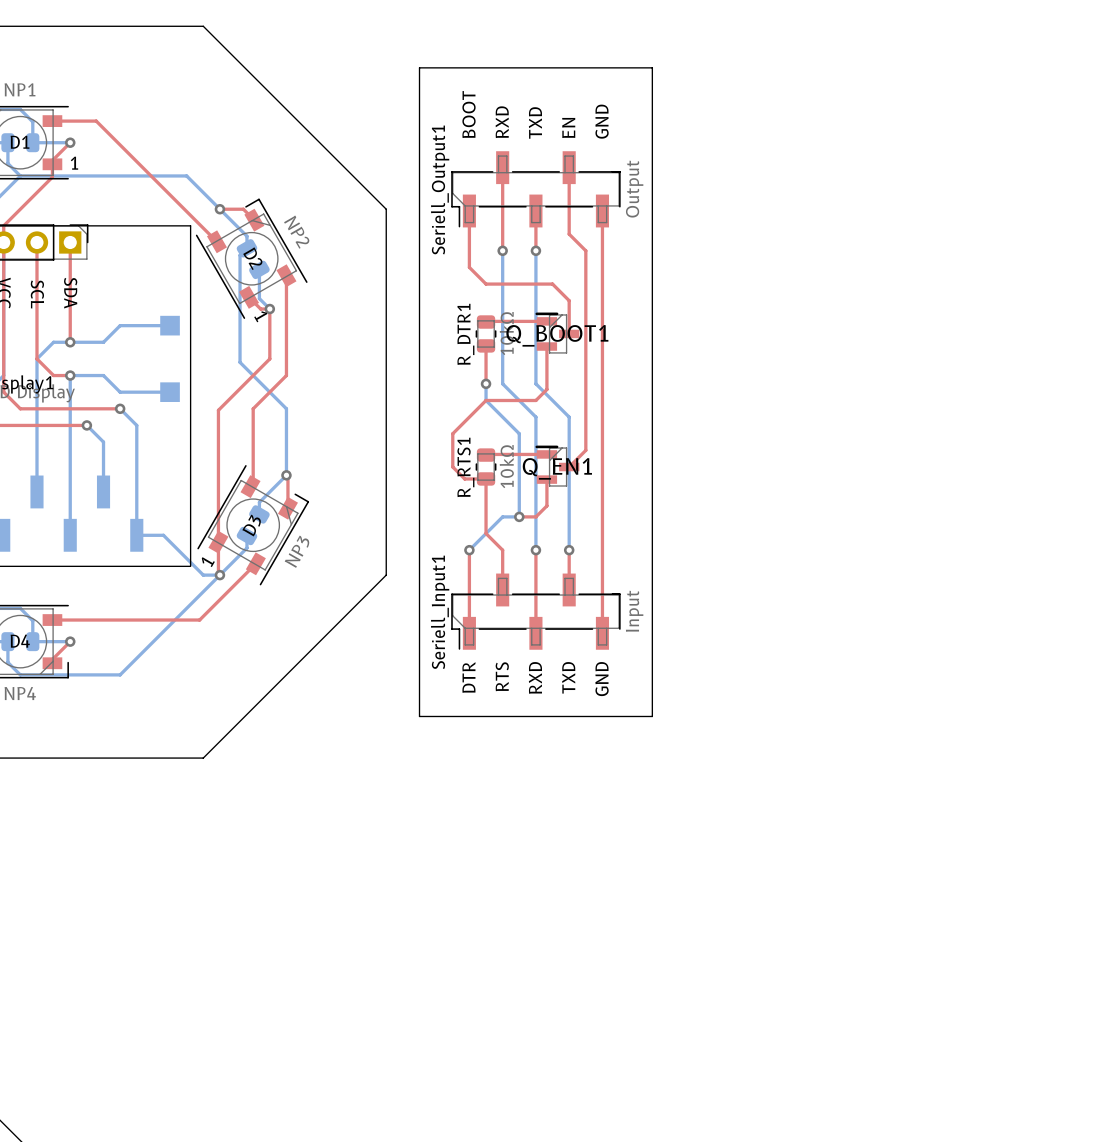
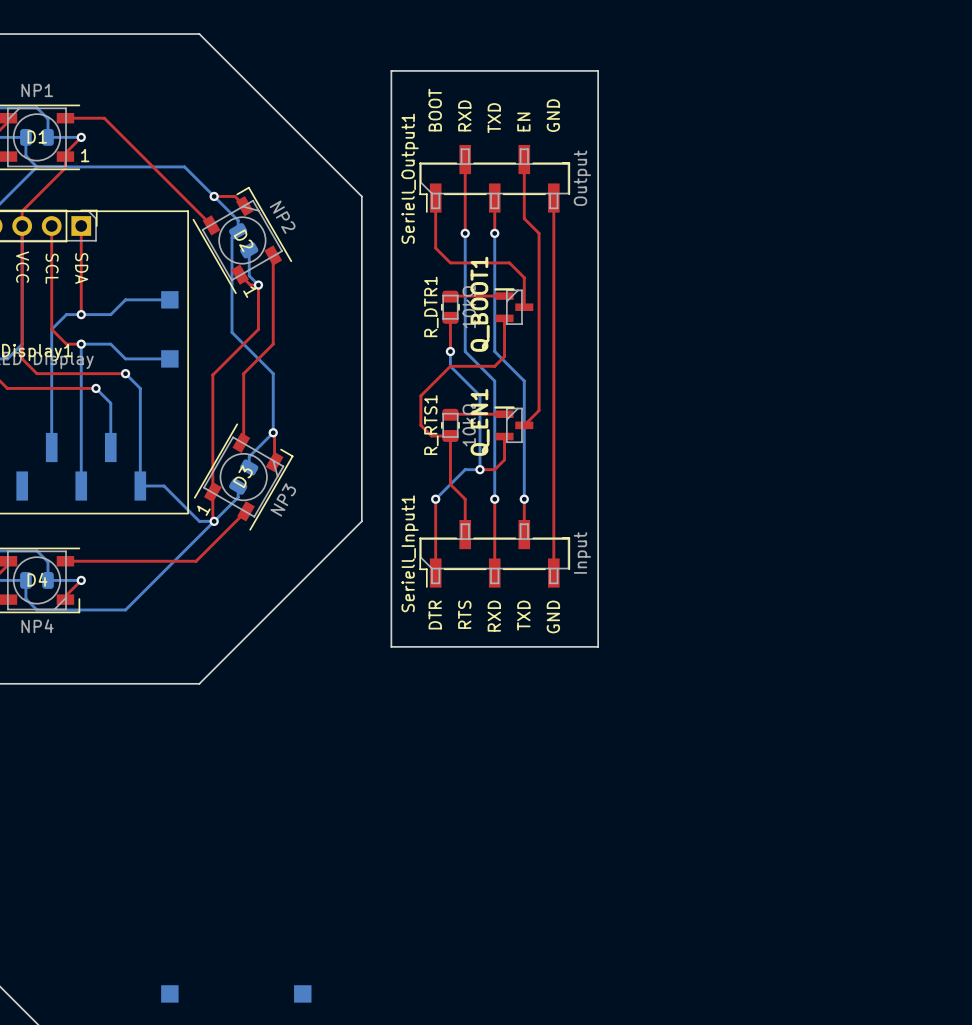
Q_BOOT1 name rotation: 0° (557, 335) -> 90° counterclockwise (480, 304)
Q_EN1 name rotation: 0° (557, 468) -> 90° counterclockwise (480, 422)
part: none -> (169, 993)
part: none -> (302, 993)

